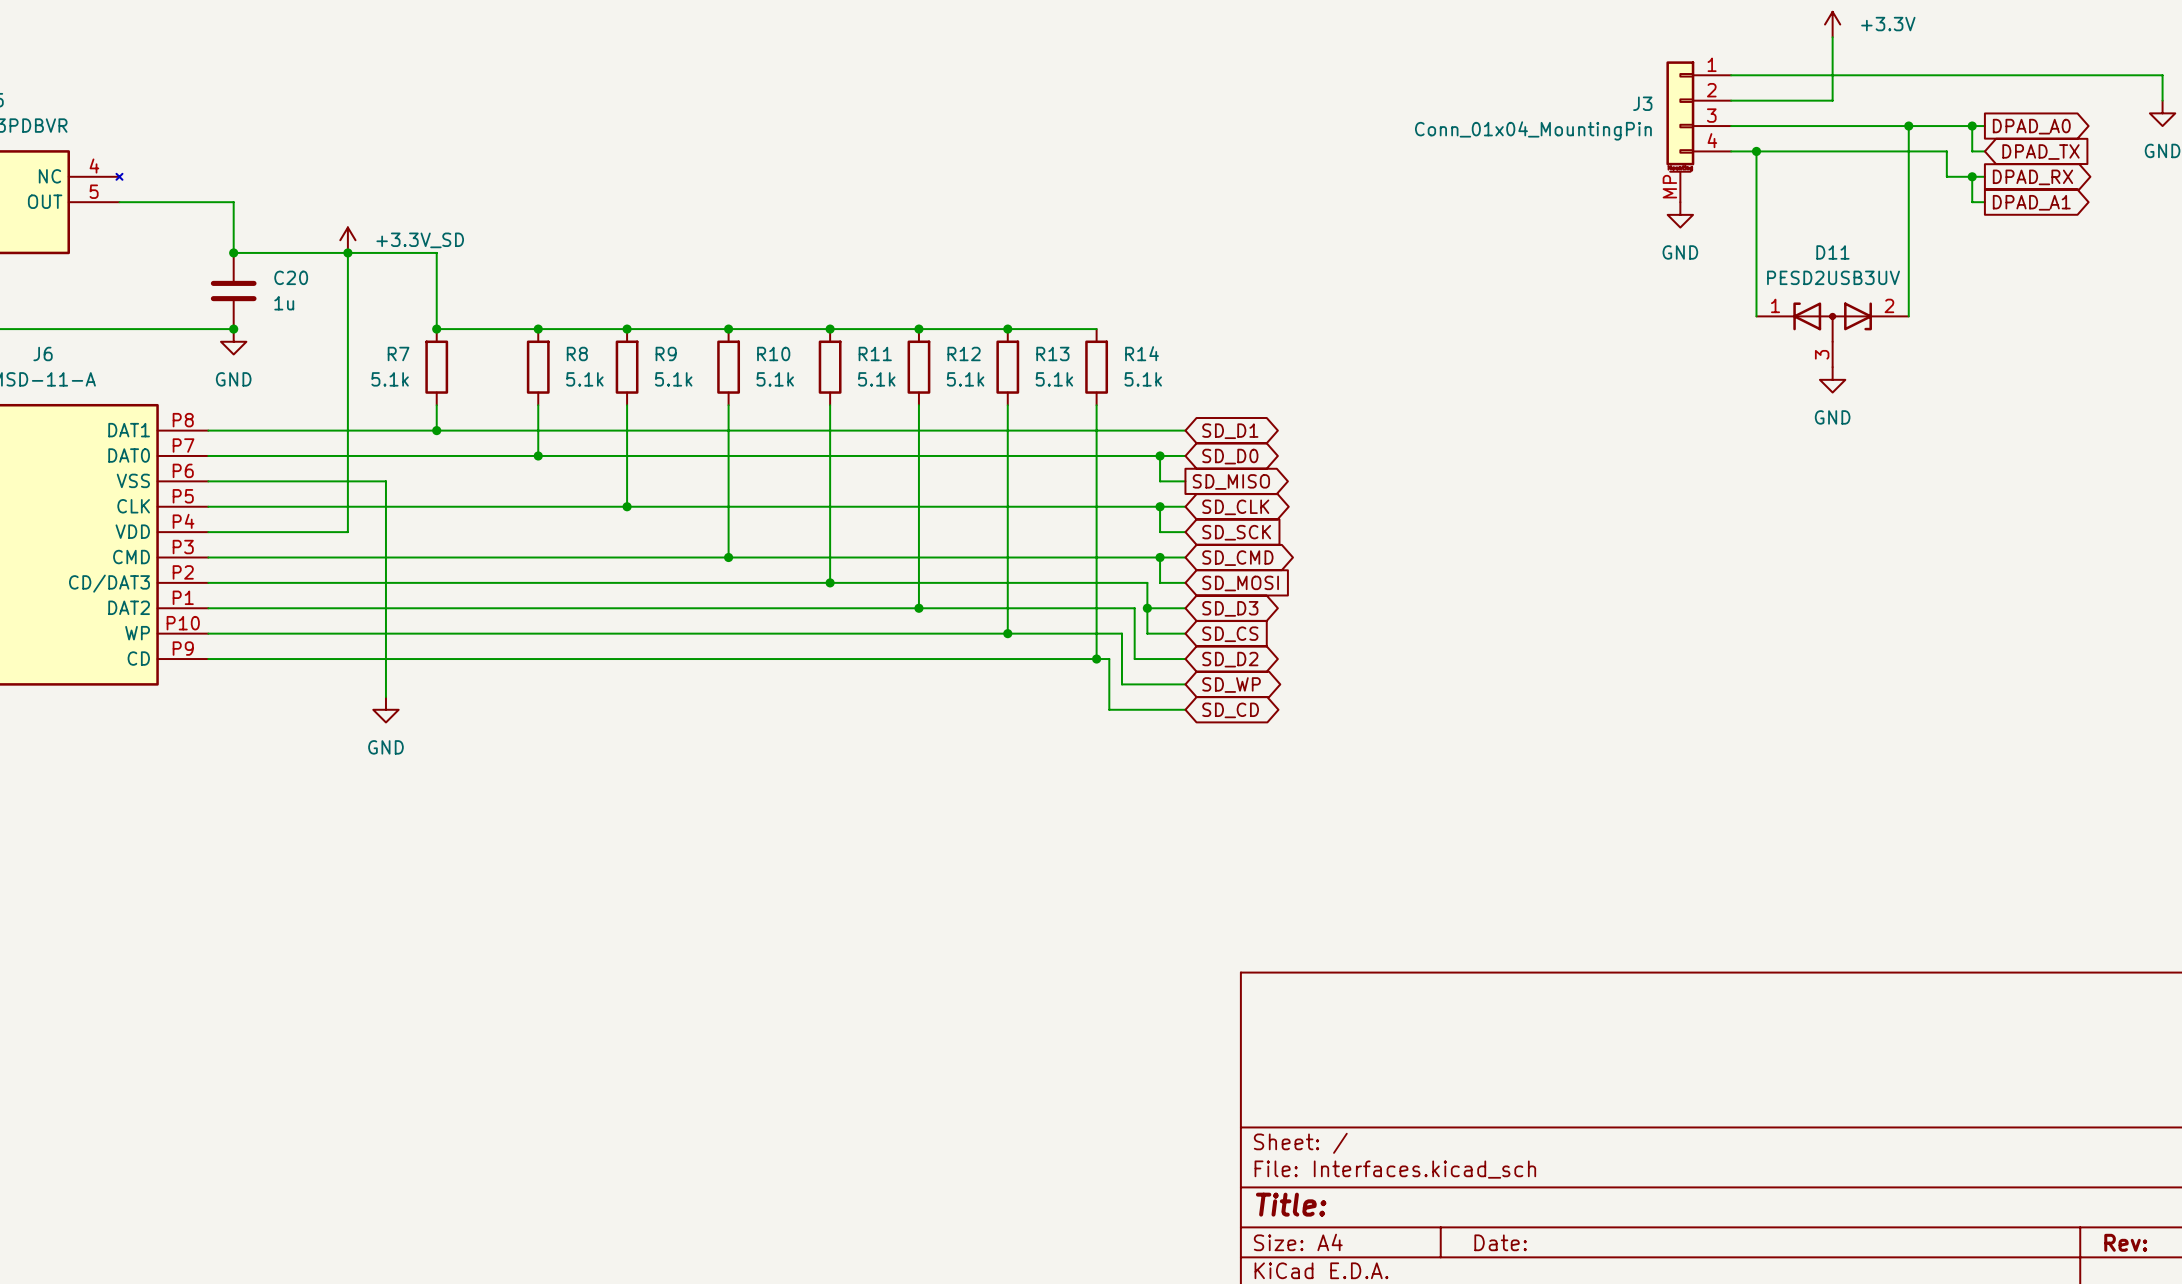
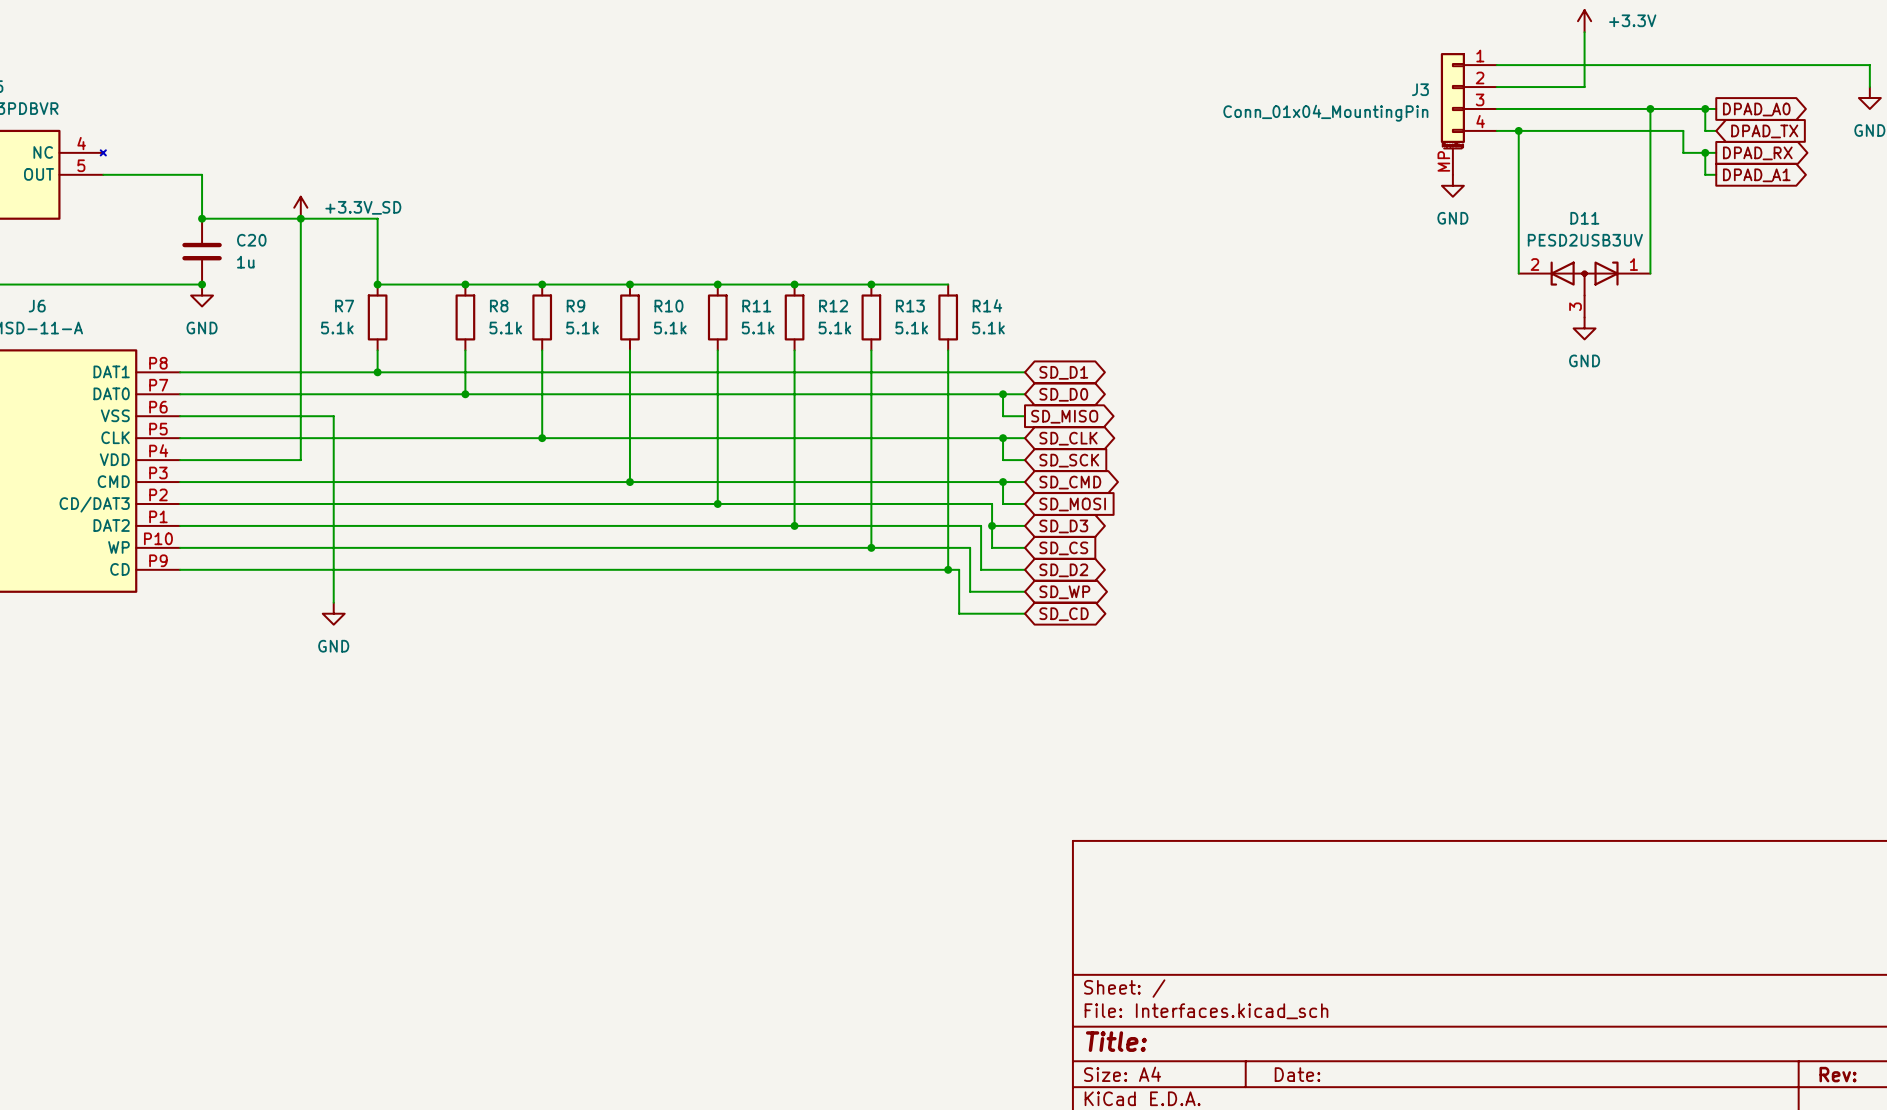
D11 flip: as is (1832, 322) -> left-right (1584, 278)

